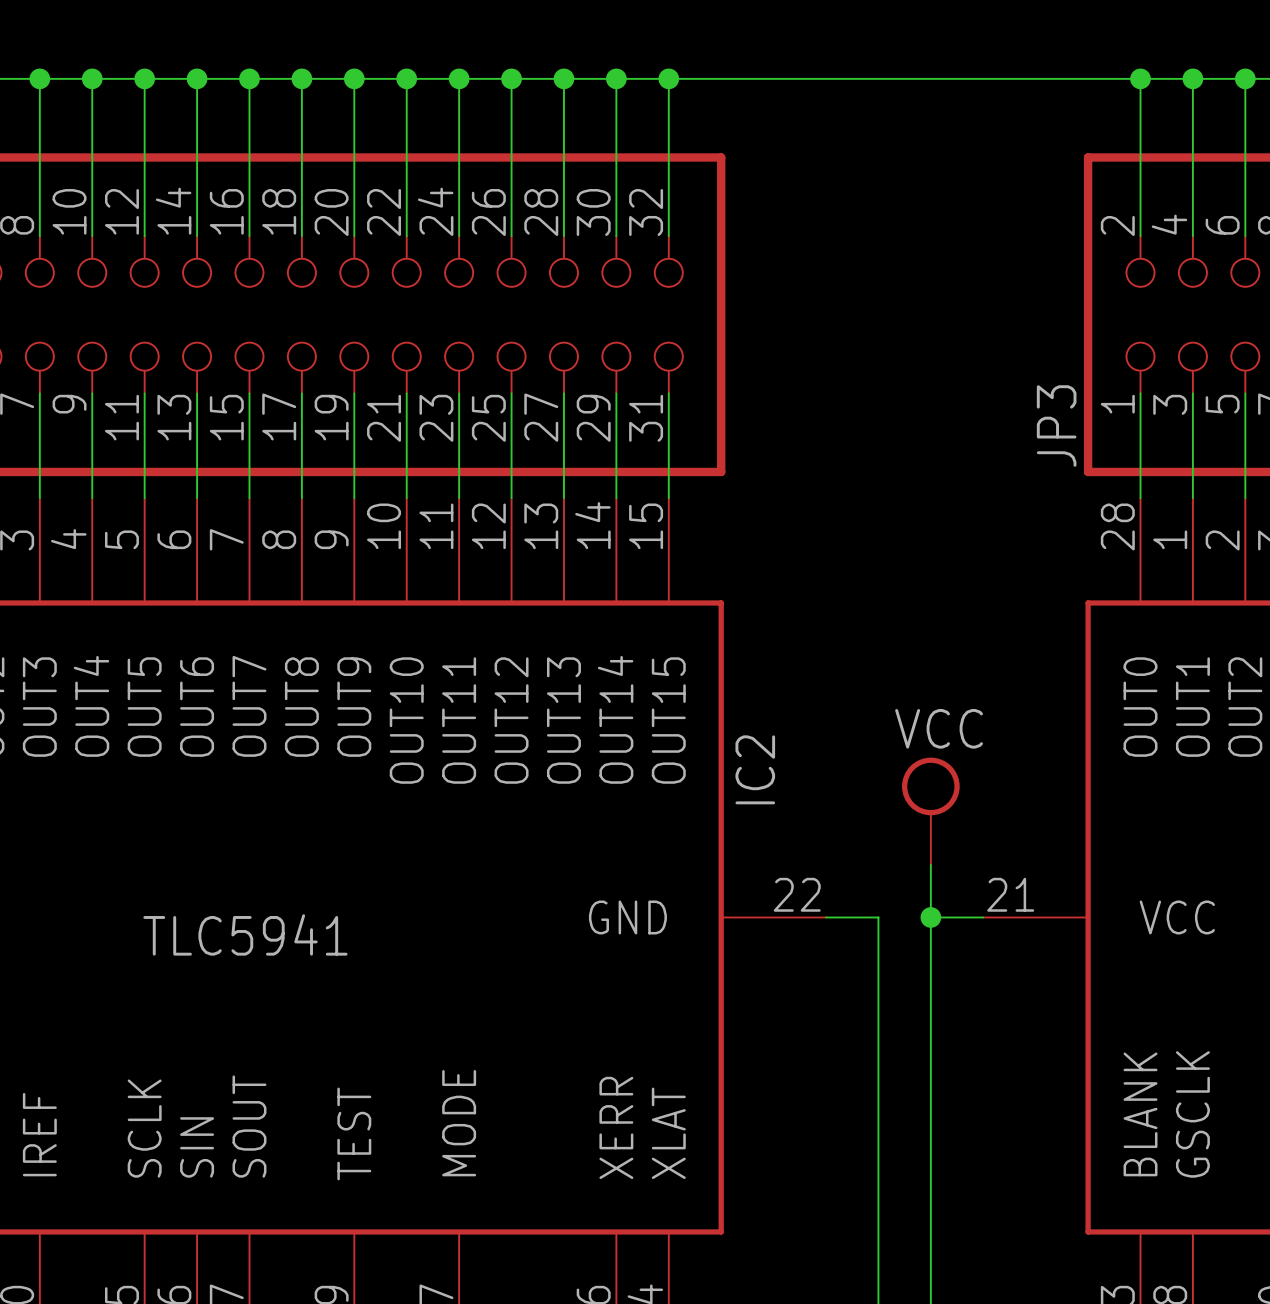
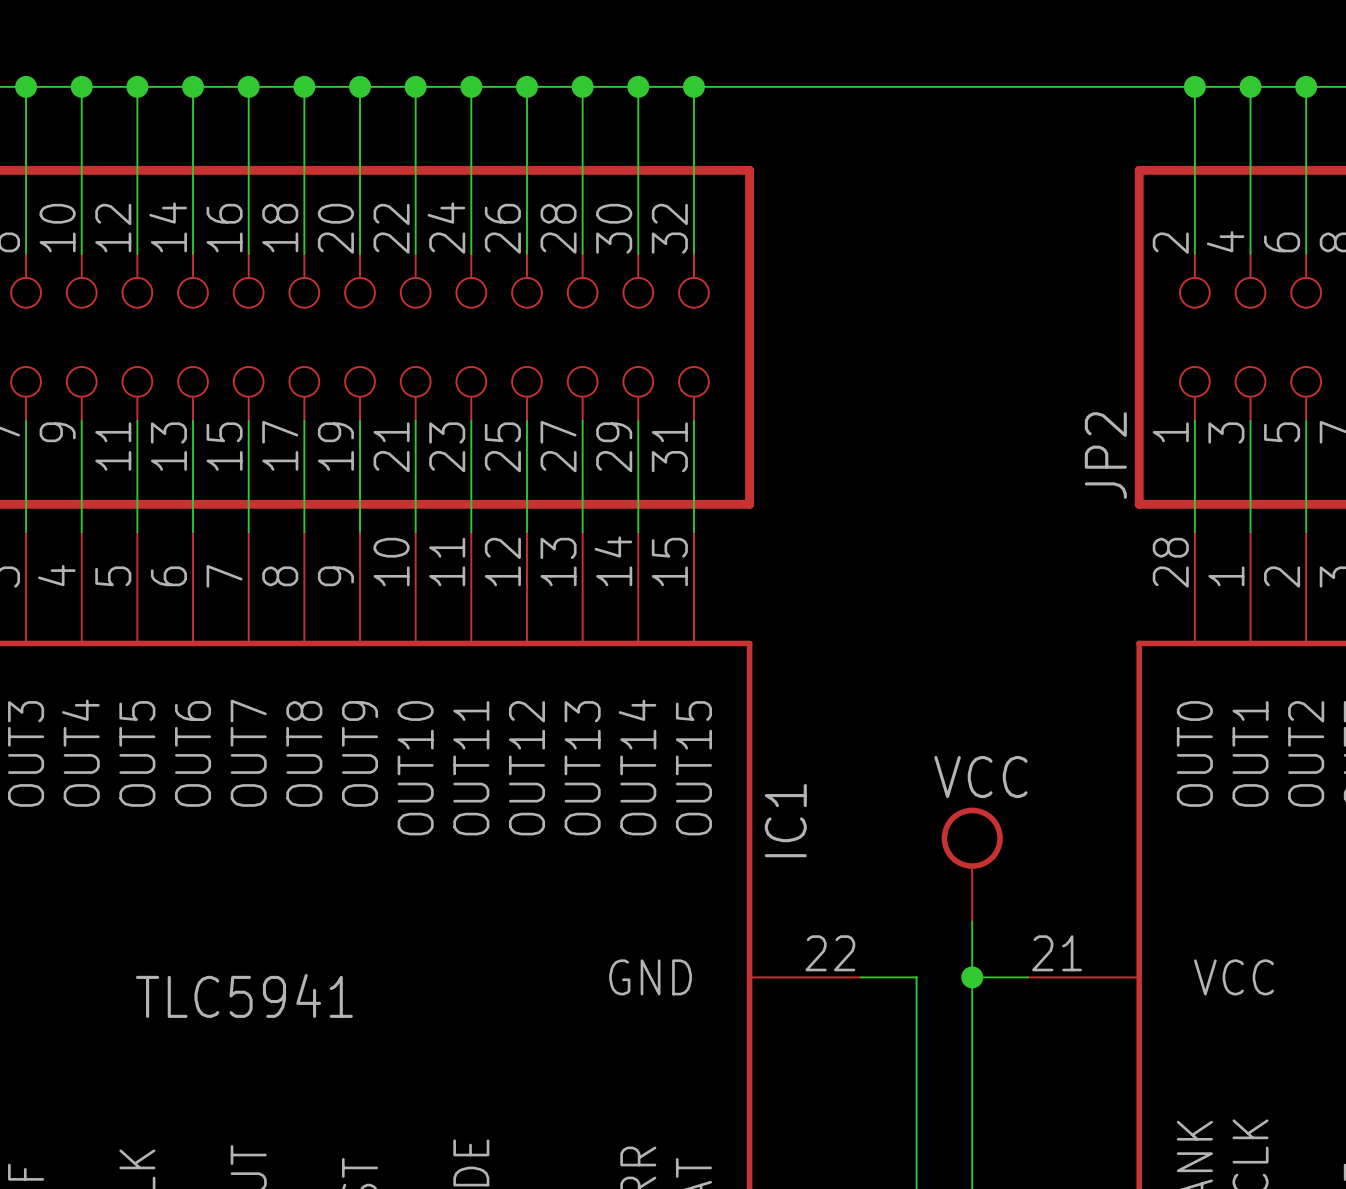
JP3 name: JP3 (1056, 426) -> JP2 (1105, 455)
IC2 name: IC2 (755, 769) -> IC1 (785, 820)

